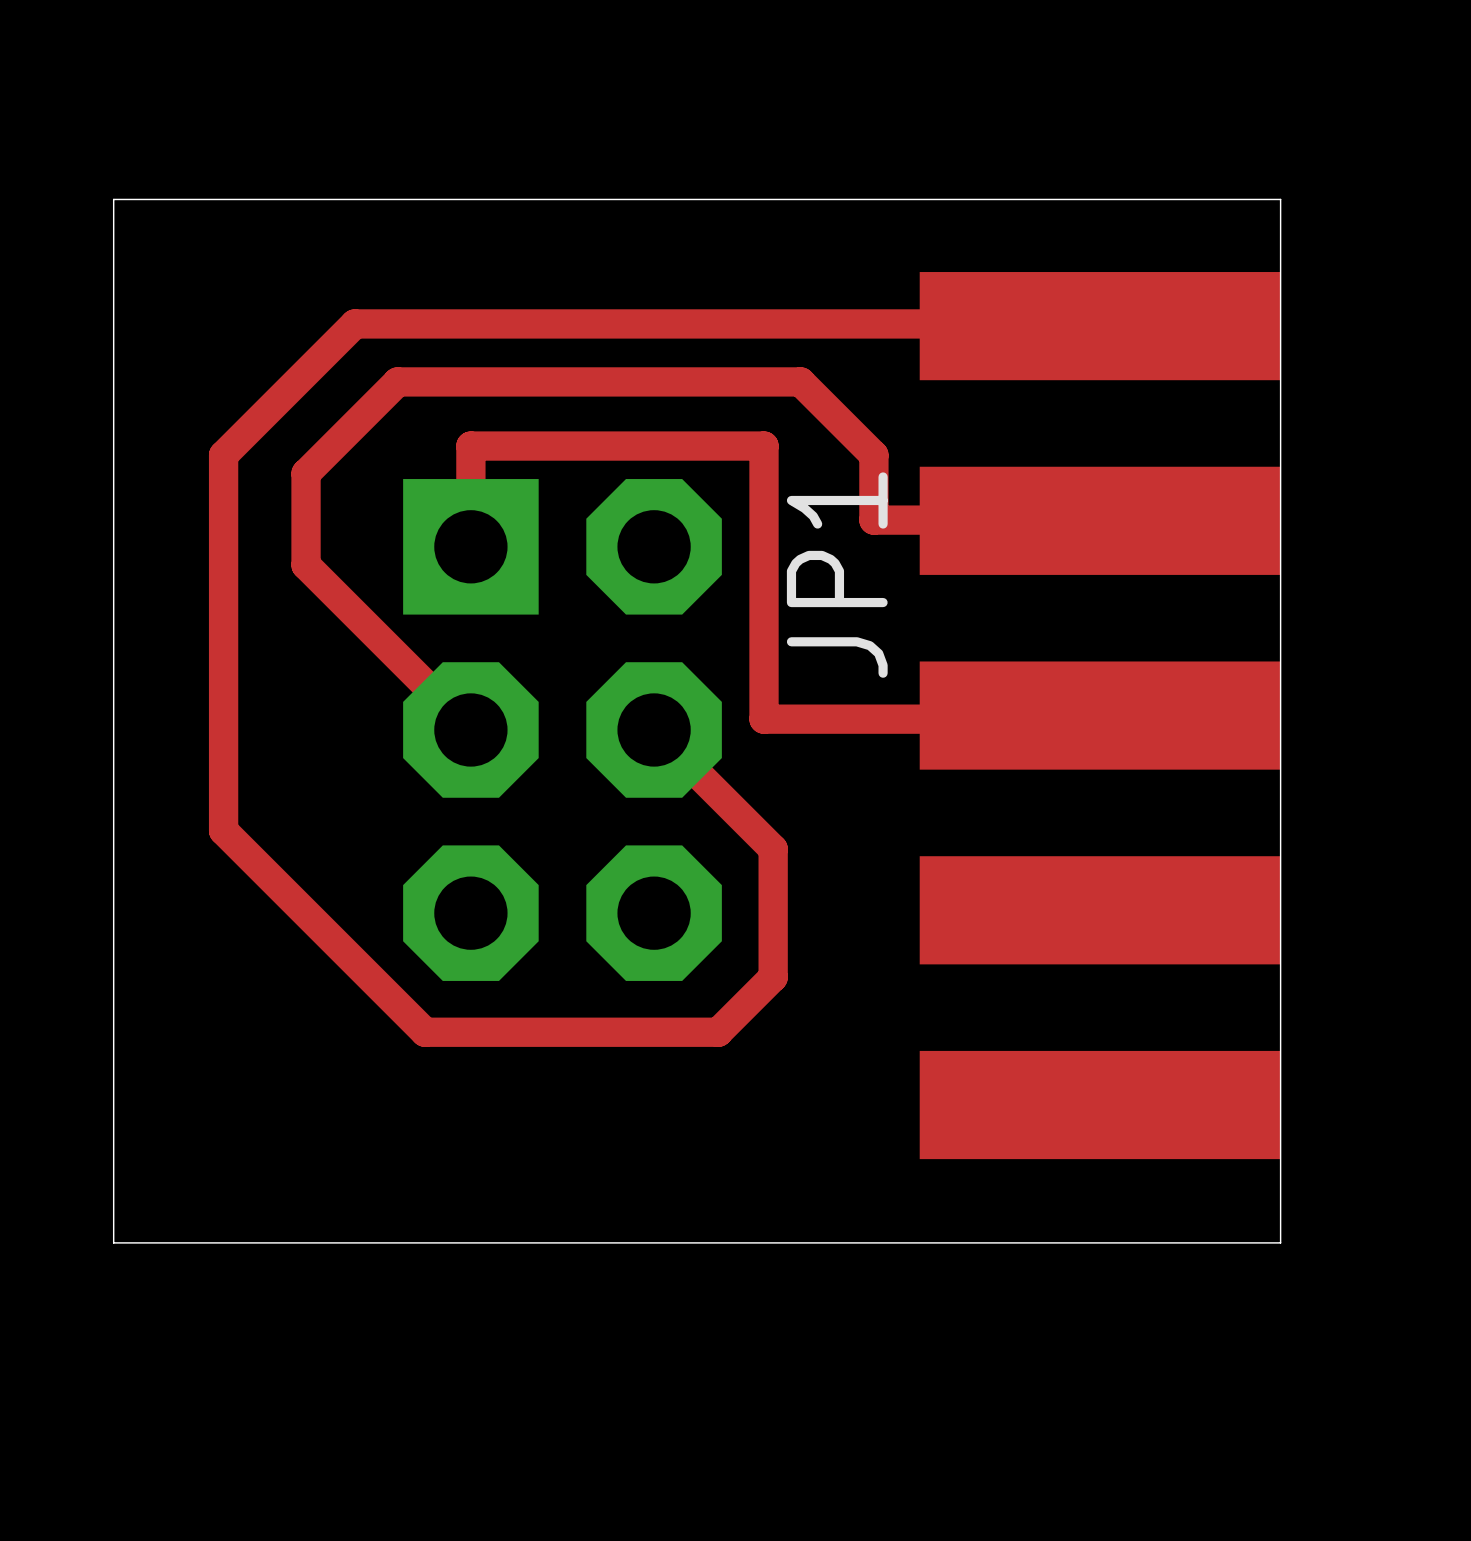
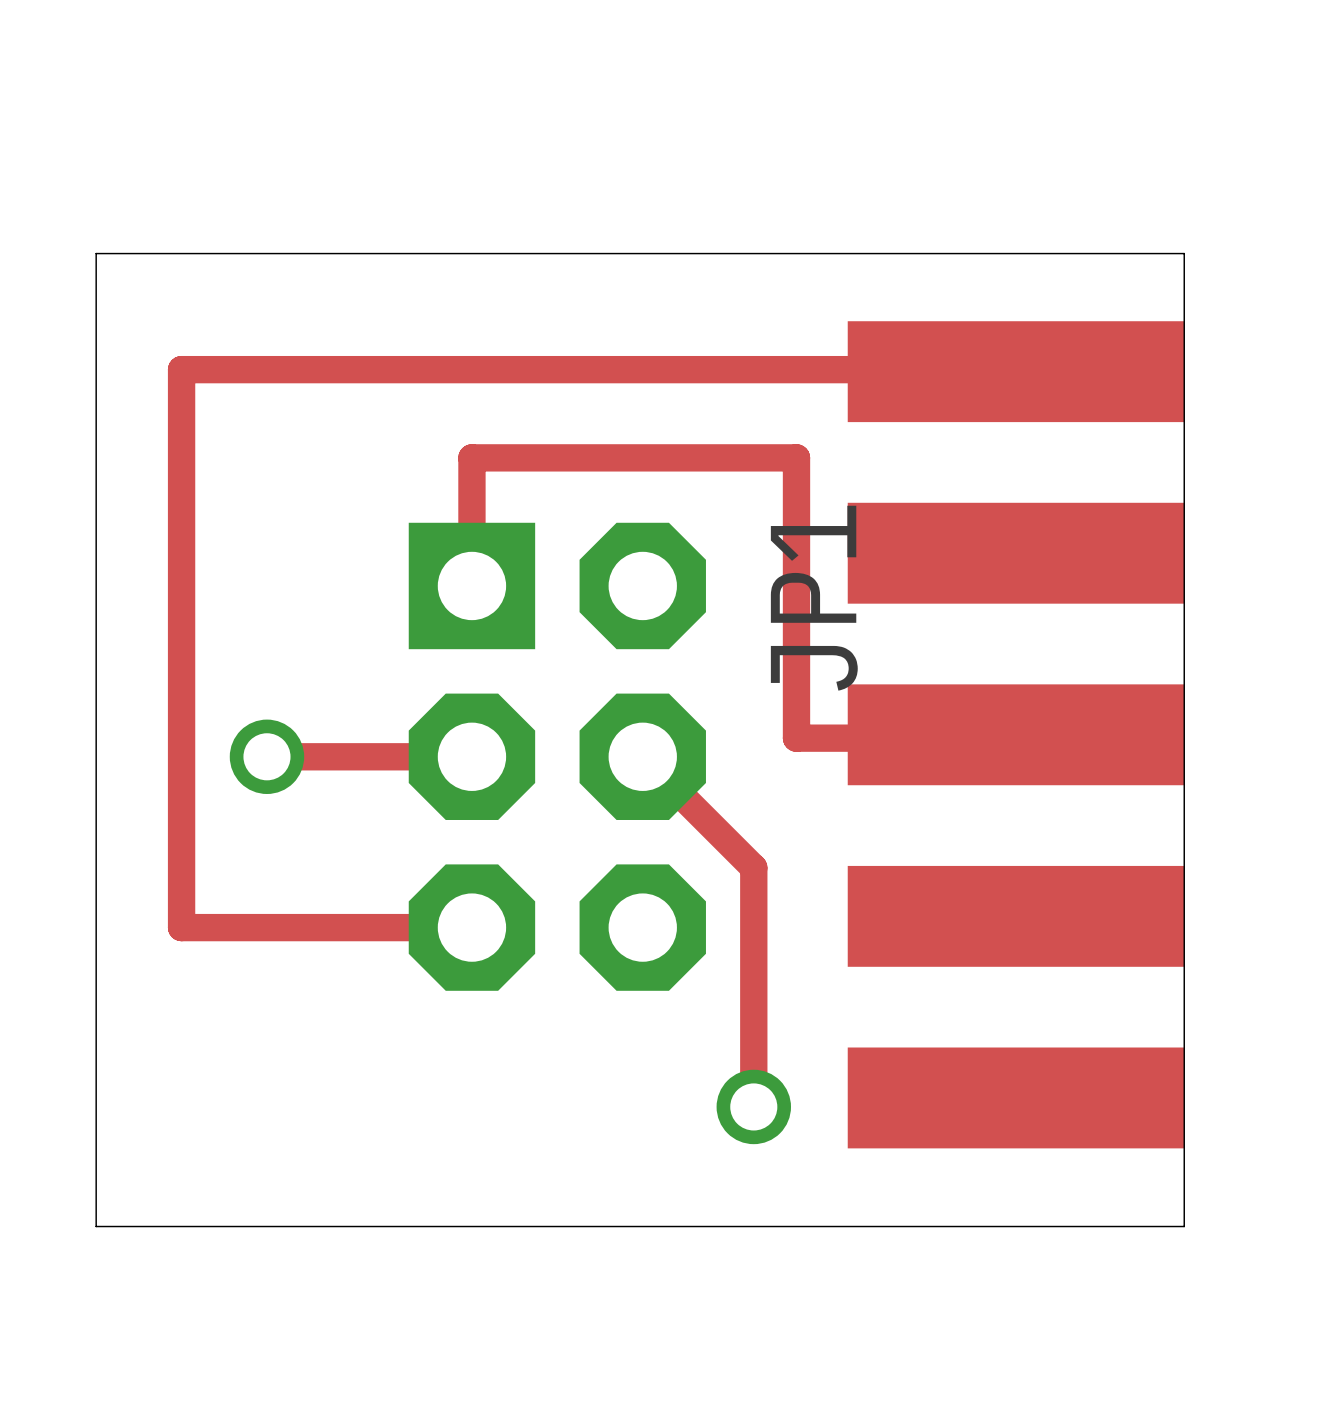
track: (354, 323) (223, 455) (223, 830) (425, 1032) (718, 1032) (773, 977) (773, 849) (654, 729) -> (321, 369) (181, 369) (181, 927) (471, 927)
track: (1206, 520) (873, 520) (873, 455) (800, 381) (397, 381) (306, 473) (306, 565) (470, 729) -> none
track: (470, 546) (470, 446) (764, 446) (764, 719) (864, 719) -> (471, 585) (471, 457) (796, 457) (796, 738)
JP1 position: (562, 729) -> (557, 756)
track: none -> (266, 756) (471, 756)
via: none -> (266, 756)
track: none -> (642, 756) (753, 867) (753, 1106)
via: none -> (753, 1106)

